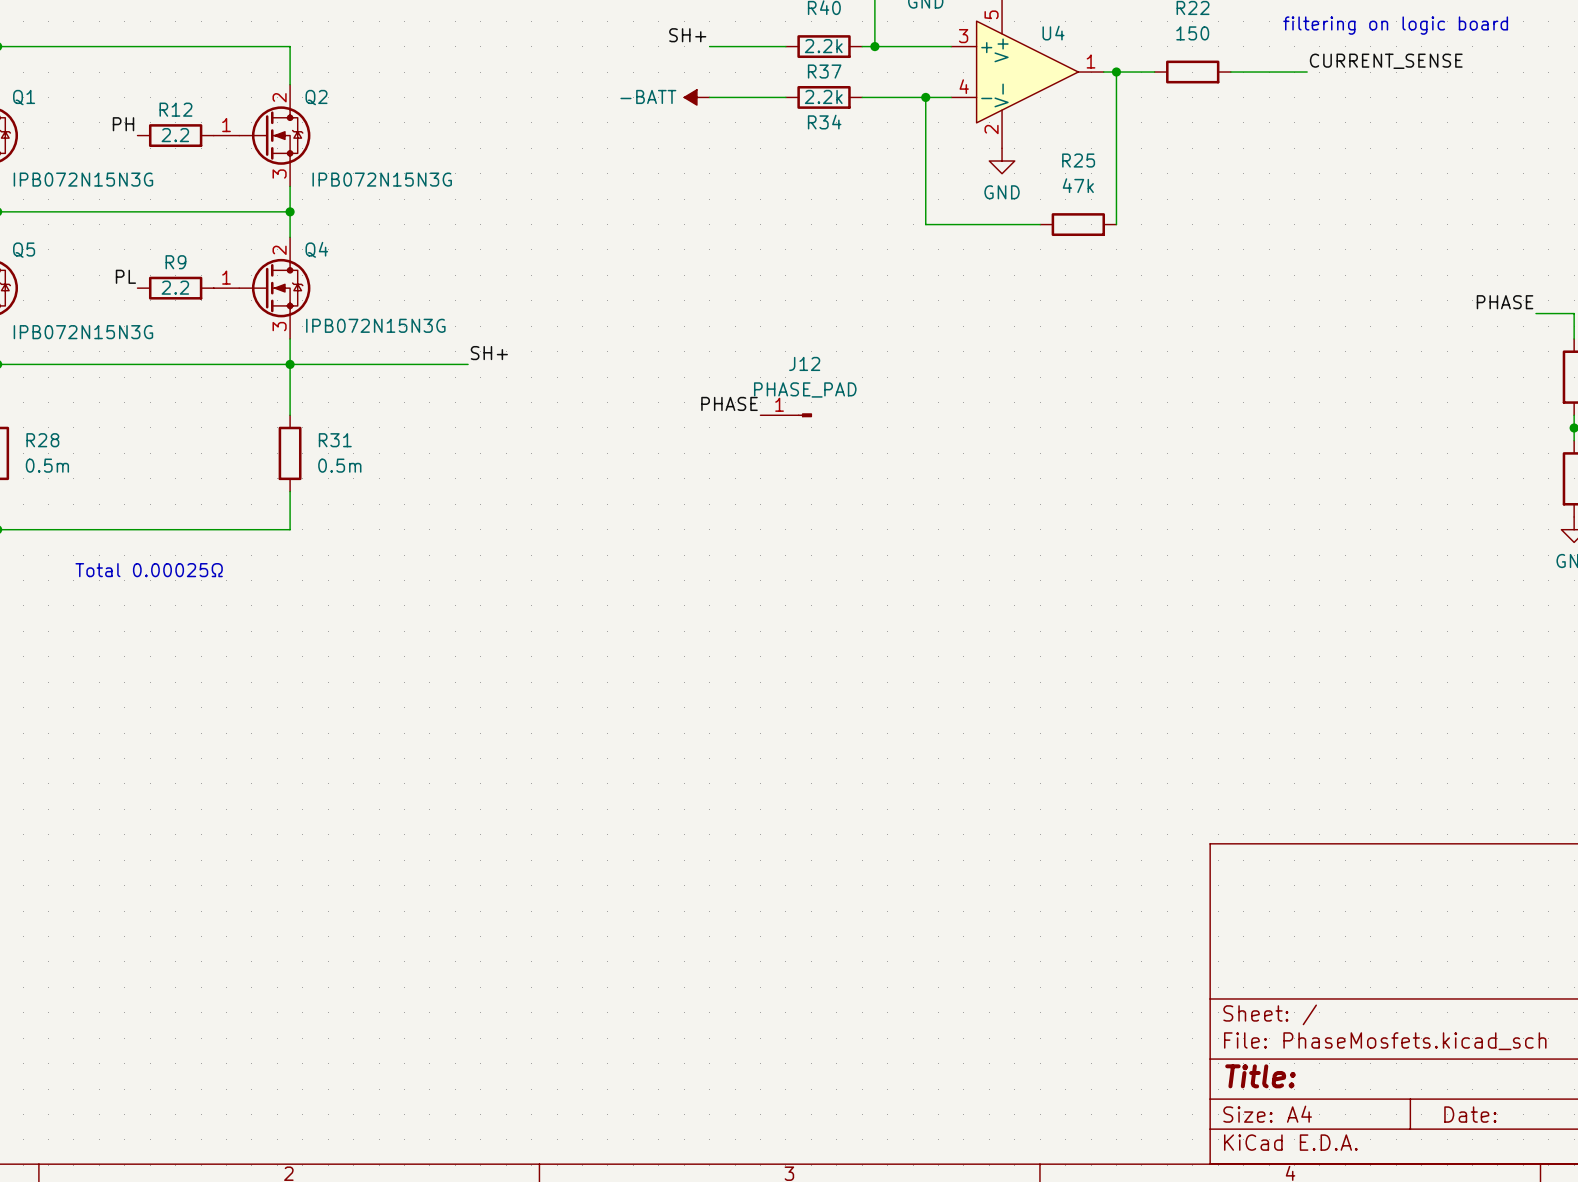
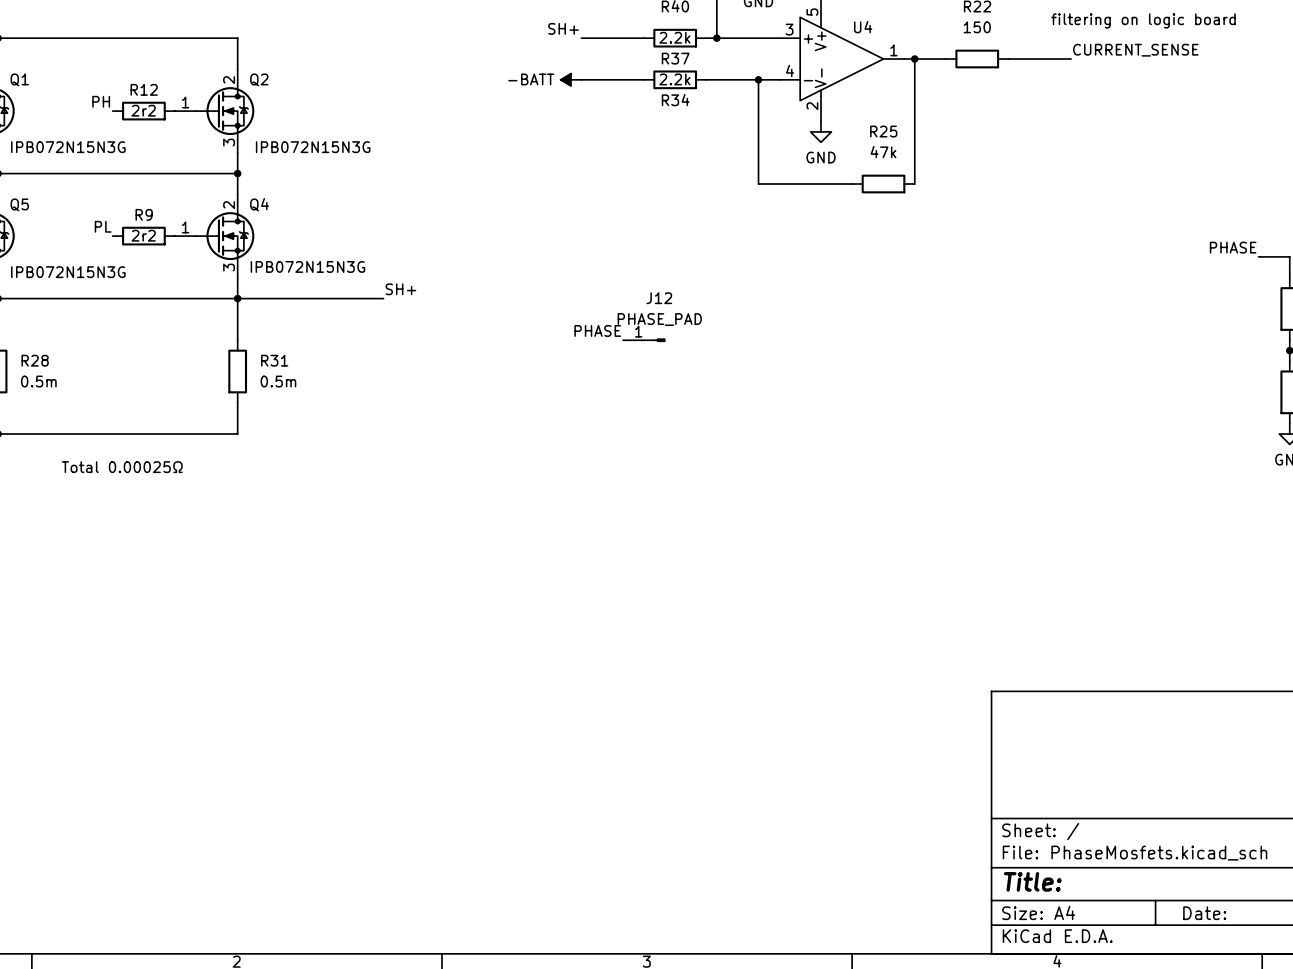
R12 value: 2.2 (175, 135) -> 2r2 (143, 110)
R9 value: 2.2 (175, 287) -> 2r2 (143, 235)

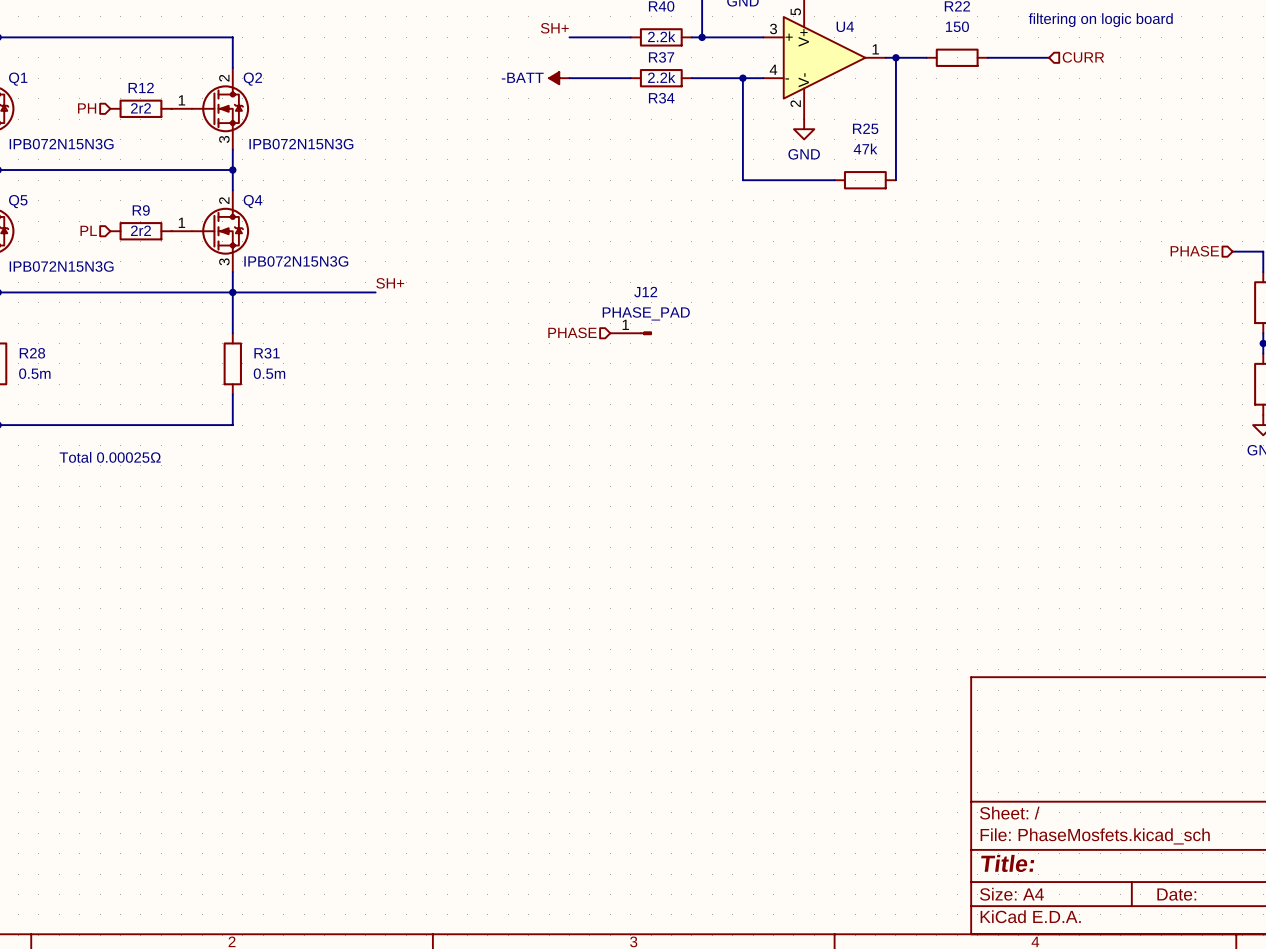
label: CURRENT_SENSE (1135, 50) -> none
hierarchical label: none -> CURR (1083, 57)
label: PH (101, 101) -> none
hierarchical label: none -> PH (87, 108)
label: PL (103, 226) -> none
hierarchical label: none -> PL (88, 230)
label: PHASE (1233, 247) -> none
hierarchical label: none -> PHASE (1194, 251)
label: PHASE (597, 330) -> none
hierarchical label: none -> PHASE (572, 332)

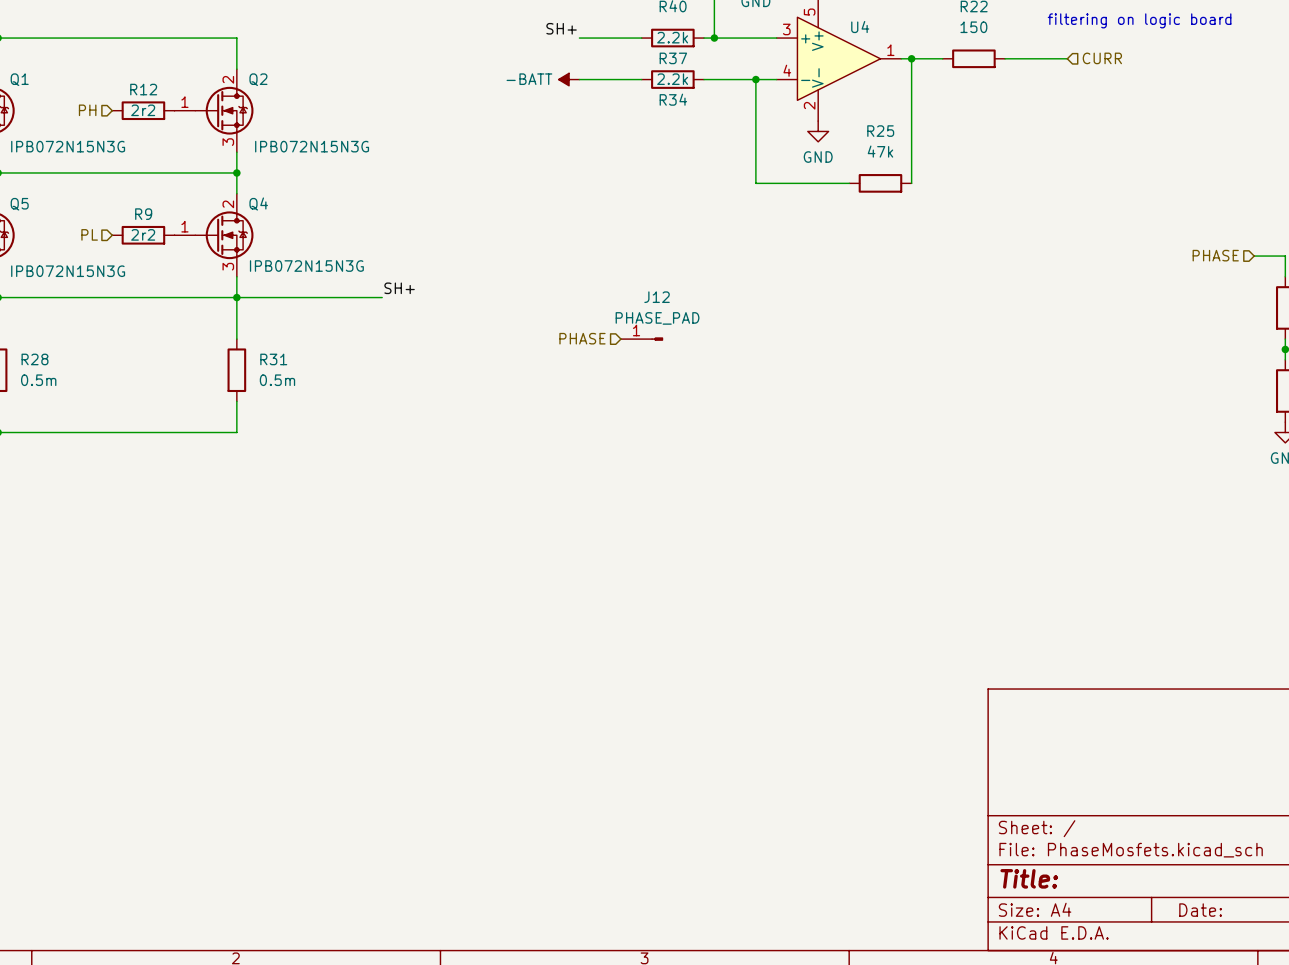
text: Total 0.00025Ω (110, 457) -> none

